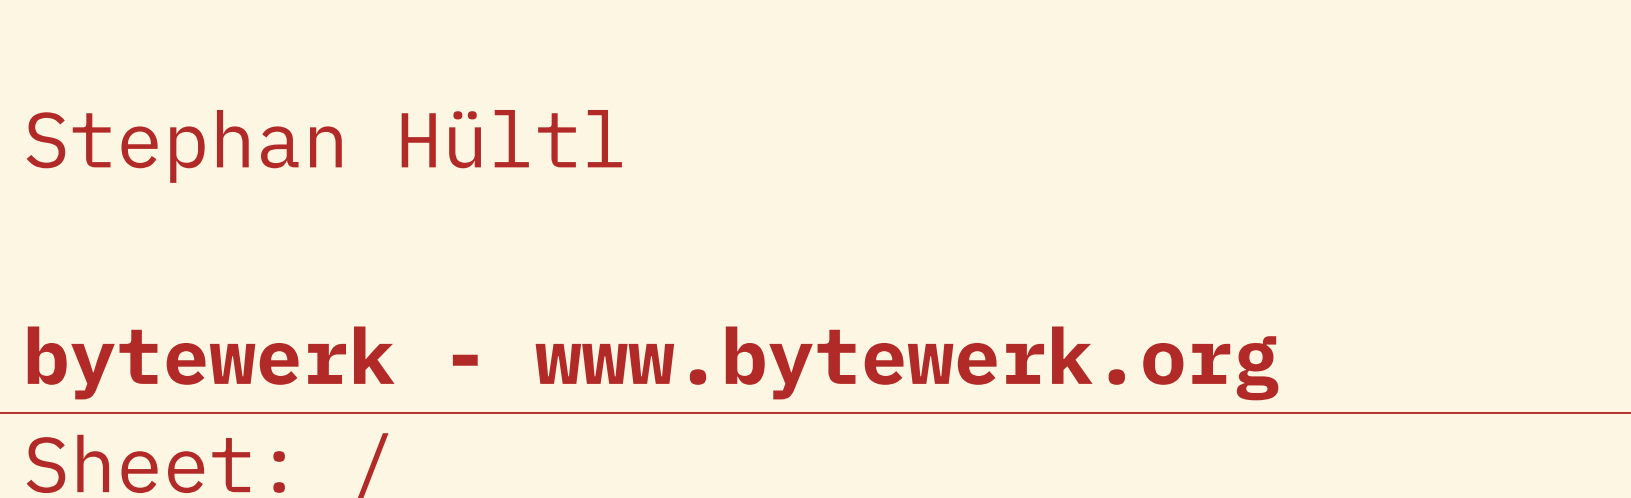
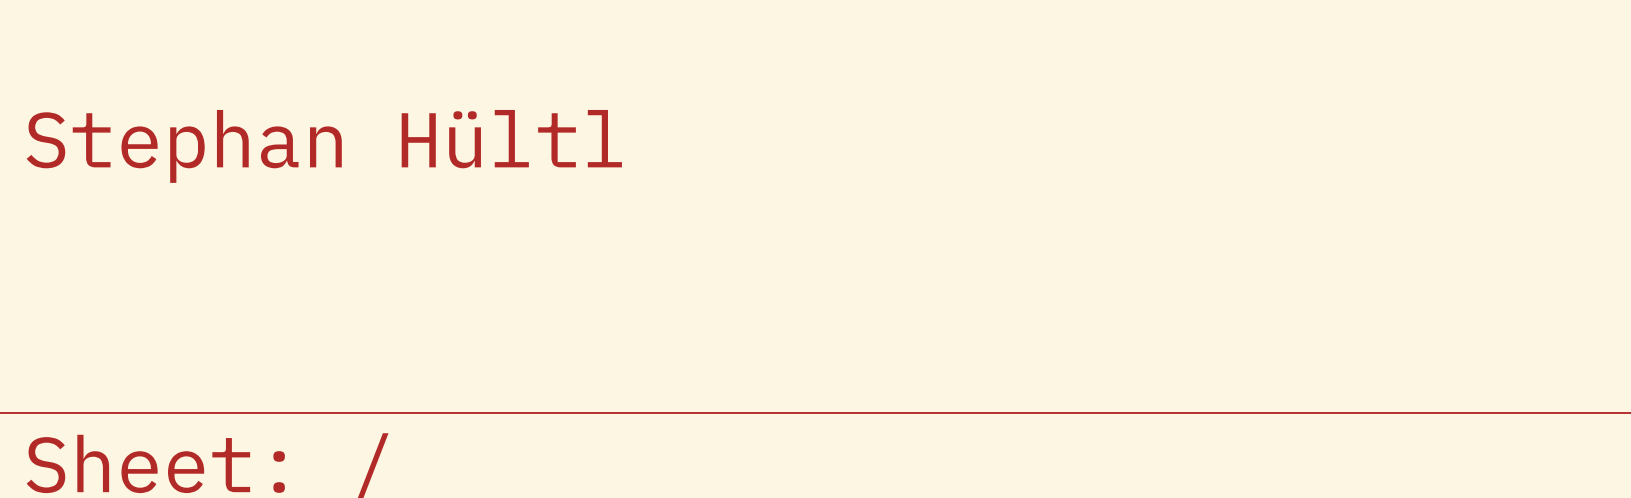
title block: bytewerk - www.bytewerk.org (653, 363) -> none

